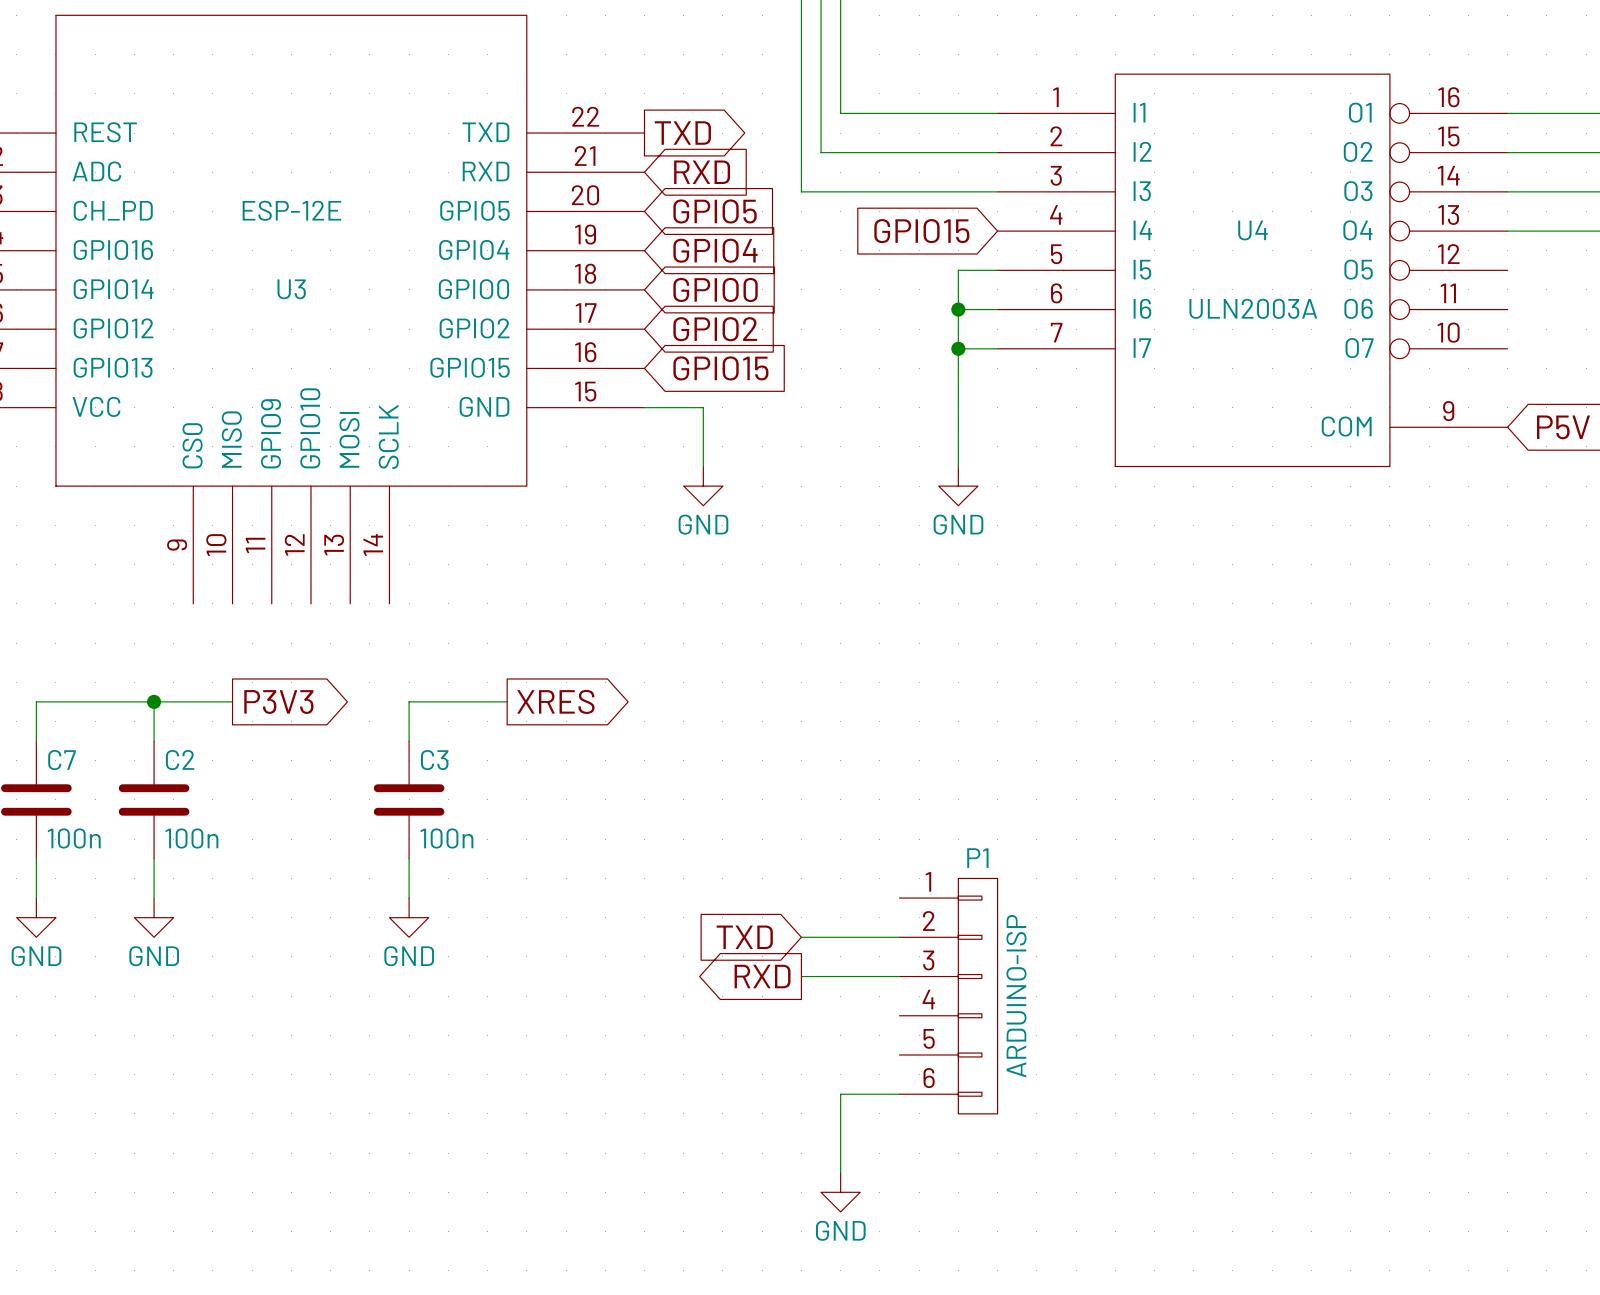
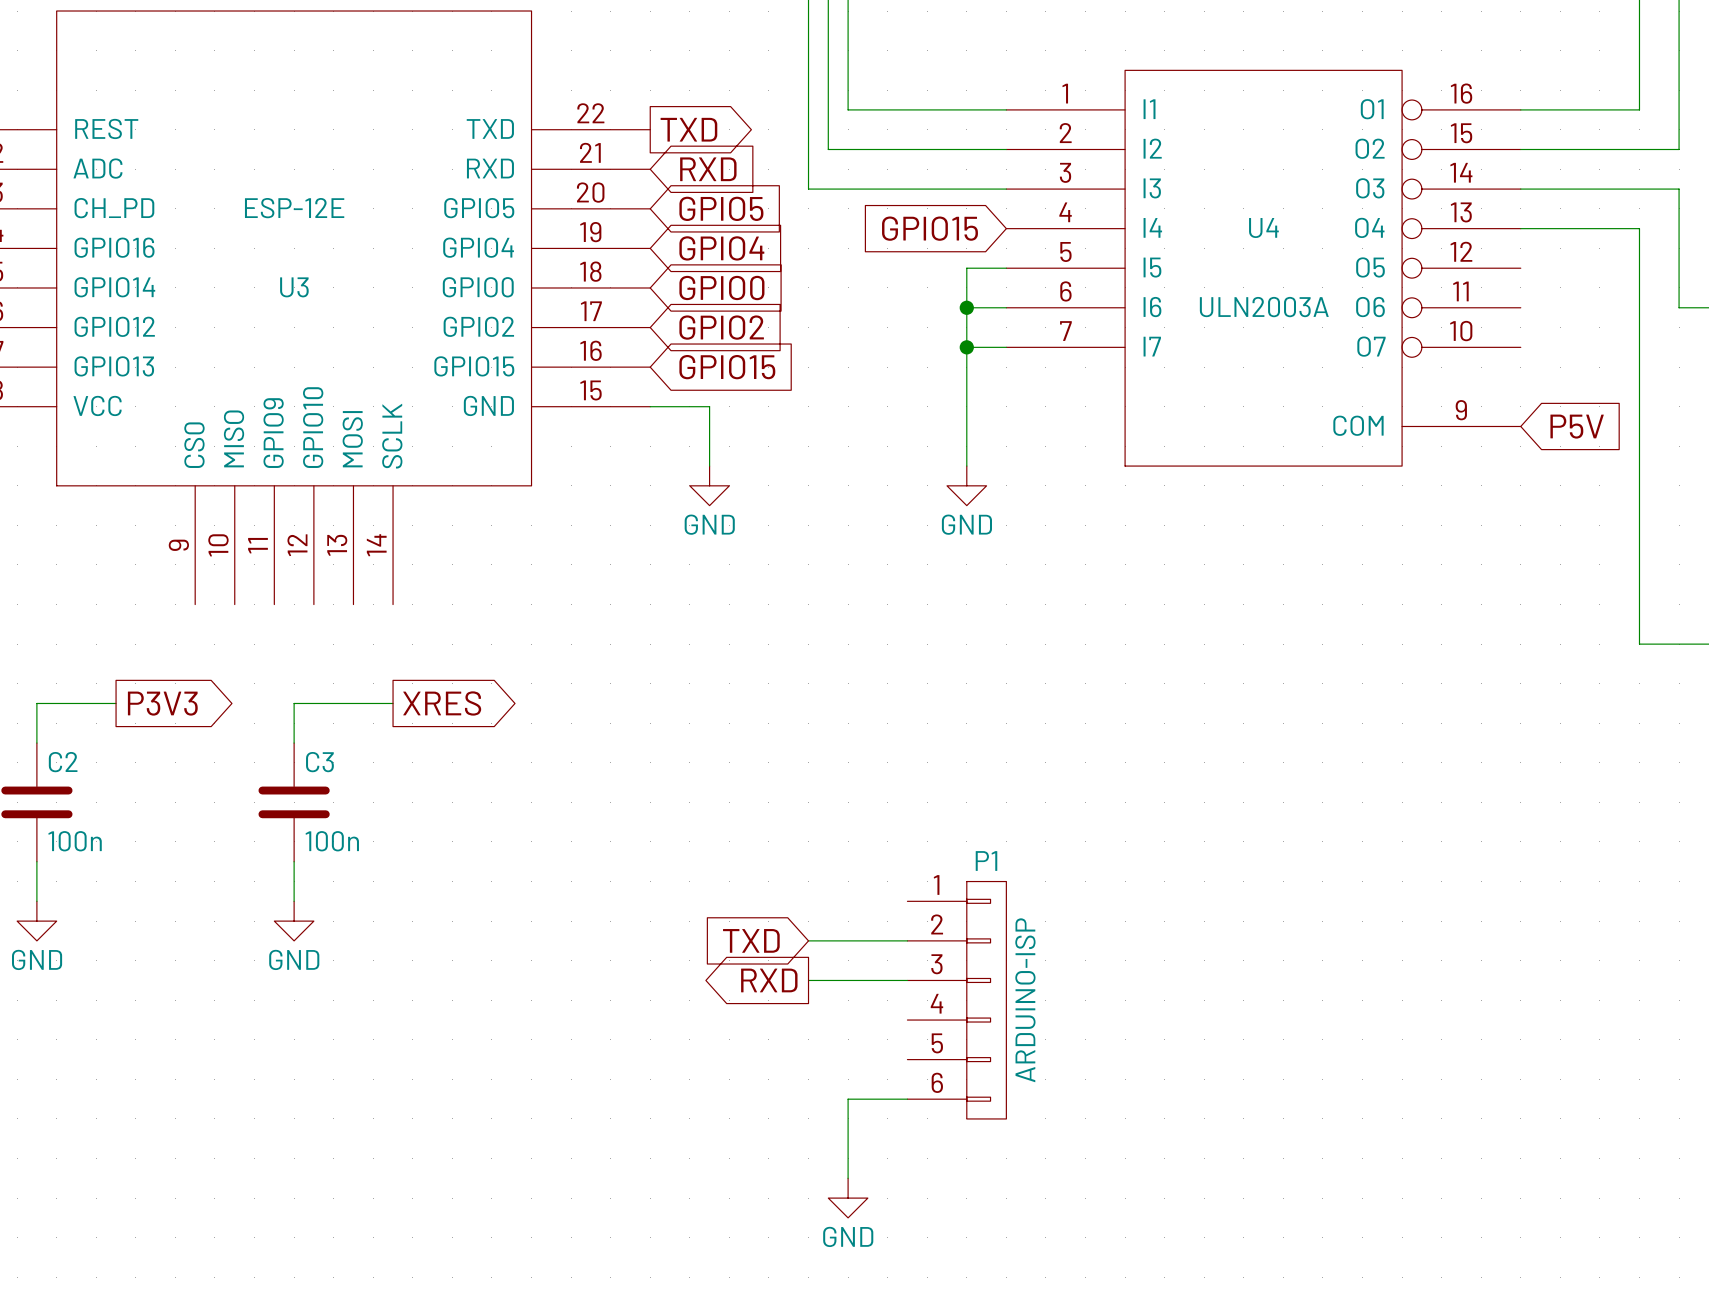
wire: (114, 701) (232, 701) -> none
wire: (154, 701) (154, 741) -> none
junction: (154, 701) -> none
wire: (507, 701) (409, 701) (409, 741) -> (393, 703) (294, 703) (294, 743)
global label position: XRES (555, 701) -> XRES (442, 703)
global label position: P3V3 (278, 702) -> P3V3 (162, 703)
C7 name: C7 (62, 760) -> C2 (63, 762)
C2: 100n (154, 799) -> none
C3 position: (409, 799) -> (294, 802)
wire: (154, 858) (154, 898) -> none
wire: (409, 858) (409, 898) -> (294, 861) (294, 901)
power symbol: GND (154, 917) -> none
power symbol: none -> GND (294, 921)
power symbol: GND (409, 917) -> none

